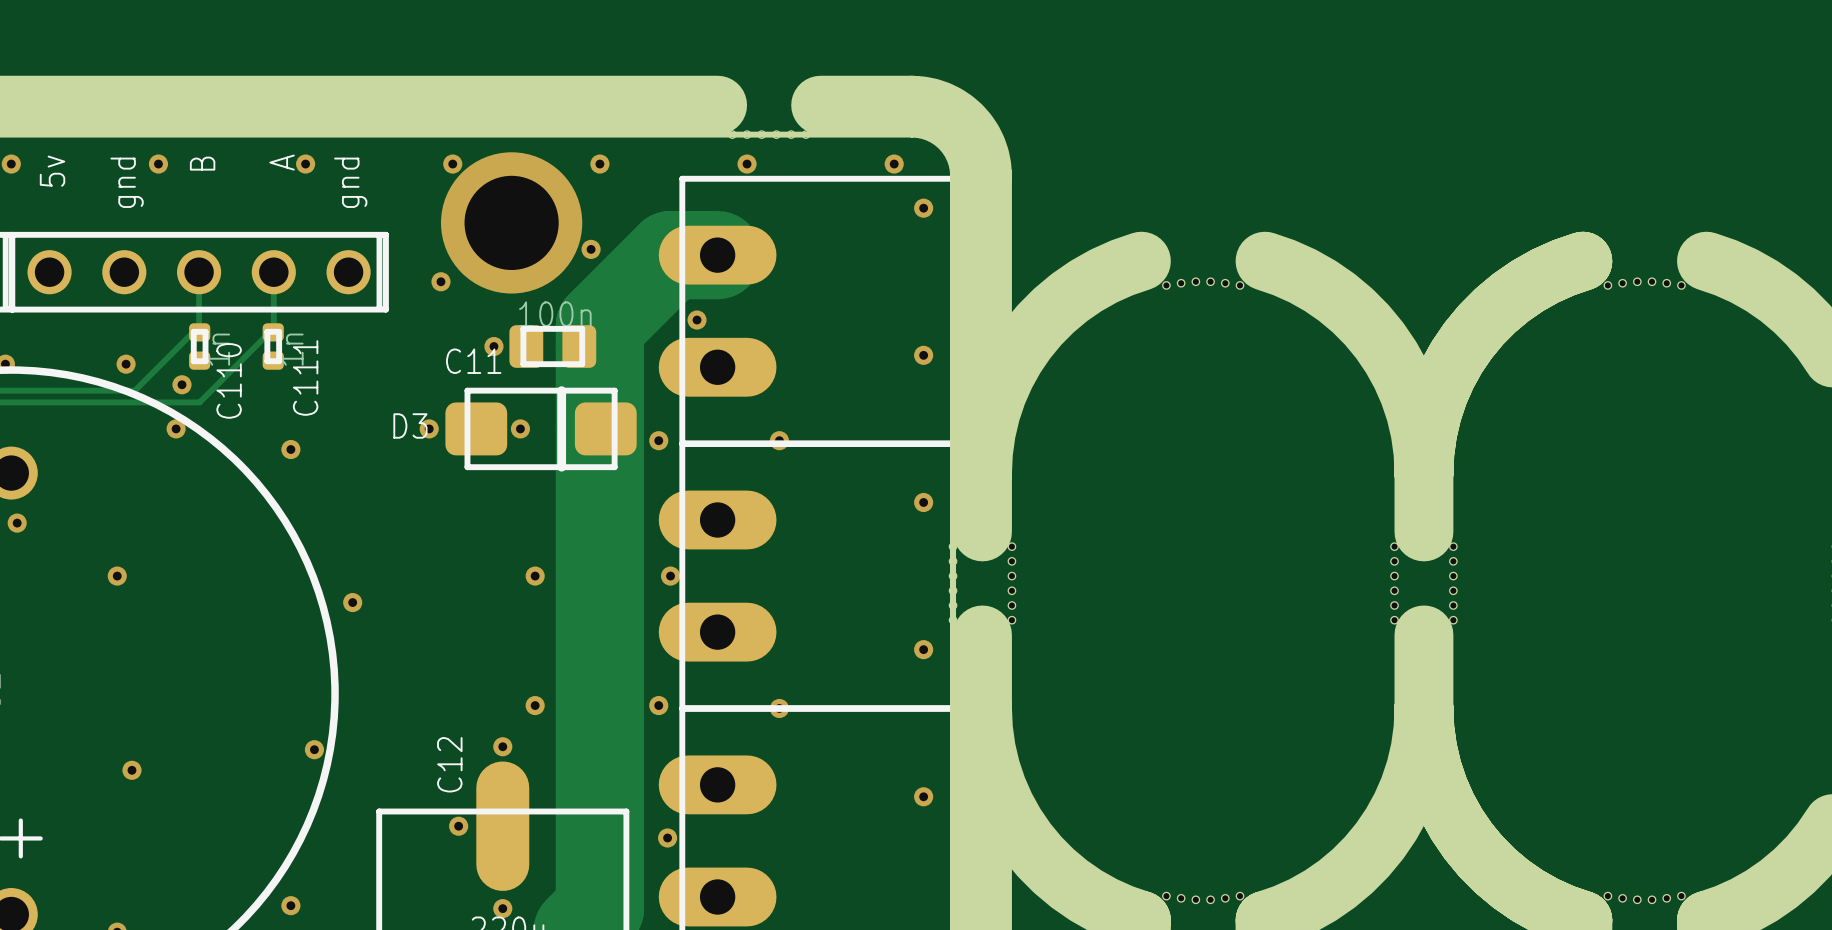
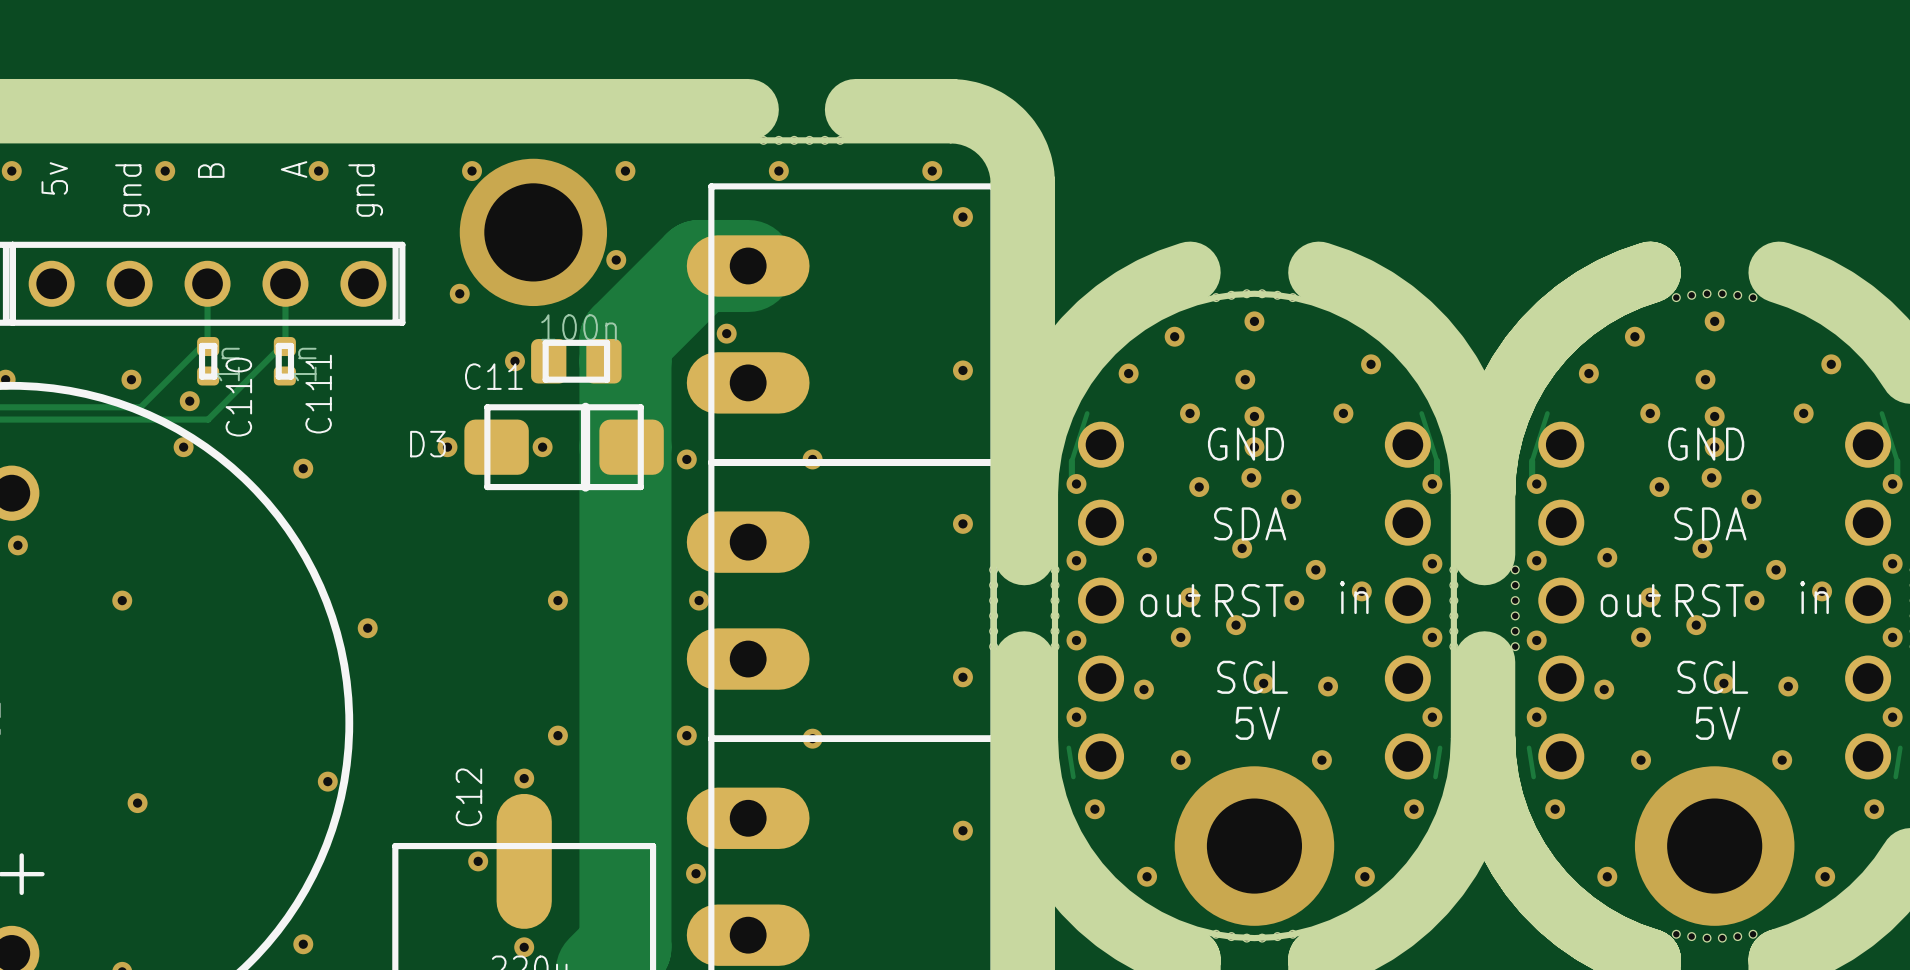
via: none -> (1254, 321)
via: none -> (1714, 321)
via: none -> (1174, 336)
via: none -> (1634, 336)
via: none -> (1371, 364)
via: none -> (1831, 364)
via: none -> (1128, 373)
via: none -> (1588, 373)
via: none -> (1245, 379)
via: none -> (1705, 379)
track: none -> (1087, 413) (1071, 460) (1071, 479) (1076, 483)
via: none -> (1190, 413)
via: none -> (1343, 413)
track: none -> (1421, 413) (1437, 460) (1437, 479) (1432, 483)
track: none -> (1547, 413) (1532, 460) (1532, 479) (1536, 483)
via: none -> (1650, 413)
via: none -> (1803, 413)
track: none -> (1881, 413) (1897, 460) (1897, 479) (1892, 483)
via: none -> (1254, 416)
via: none -> (1714, 416)
text: none -> GND (1245, 444)
text: none -> GND (1706, 444)
via: none -> (1254, 447)
via: none -> (1714, 447)
via: none -> (1251, 477)
via: none -> (1711, 477)
via: none -> (1076, 483)
via: none -> (1432, 483)
via: none -> (1536, 483)
via: none -> (1892, 483)
via: none -> (1199, 487)
via: none -> (1659, 487)
board edge: none -> (1453, 493) (1452, 758) (1445, 796) (1438, 814) (1430, 832) (1408, 865) (1380, 892) (1348, 914) (1312, 929) (1273, 937) (1234, 937) (1196, 929) (1160, 914) (1127, 892) (1100, 865) (1078, 832) (1063, 796) (1055, 758) (1055, 473) (1063, 435) (1070, 416) (1078, 399) (1100, 366) (1127, 339) (1143, 327) (1160, 317) (1196, 302) (1215, 297) (1254, 293) (1293, 297) (1312, 302) (1348, 317) (1365, 327) (1380, 339) (1408, 366) (1430, 399) (1445, 435) (1450, 454) (1453, 493)
via: none -> (1291, 499)
via: none -> (1751, 499)
text: none -> SDA (1250, 523)
text: none -> SDA (1710, 523)
via: none -> (1242, 548)
via: none -> (1702, 548)
via: none -> (1147, 557)
via: none -> (1607, 557)
via: none -> (1076, 560)
via: none -> (1536, 560)
via: none -> (1432, 563)
via: none -> (1892, 563)
via: none -> (1315, 569)
via: none -> (1776, 569)
via: none -> (1361, 591)
via: none -> (1822, 591)
via: none -> (1190, 597)
text: none -> in (1354, 597)
via: none -> (1650, 597)
text: none -> in (1814, 597)
part: none -> (1101, 600)
text: none -> out (1170, 600)
text: none -> RST (1249, 600)
via: none -> (1294, 600)
part: none -> (1407, 600)
part: none -> (1561, 600)
text: none -> out (1630, 600)
text: none -> RST (1709, 600)
via: none -> (1754, 600)
part: none -> (1868, 600)
via: none -> (1236, 625)
via: none -> (1696, 625)
via: none -> (1180, 637)
via: none -> (1432, 637)
via: none -> (1641, 637)
via: none -> (1892, 637)
via: none -> (1076, 640)
via: none -> (1536, 640)
text: none -> SCL (1252, 677)
text: none -> SCL (1712, 677)
via: none -> (1263, 683)
via: none -> (1723, 683)
via: none -> (1328, 686)
via: none -> (1788, 686)
via: none -> (1143, 689)
via: none -> (1604, 689)
via: none -> (1076, 717)
via: none -> (1432, 717)
via: none -> (1536, 717)
via: none -> (1892, 717)
text: none -> 5V (1257, 723)
text: none -> 5V (1718, 723)
track: none -> (1068, 747) (1073, 777)
track: none -> (1440, 747) (1435, 777)
track: none -> (1529, 747) (1533, 777)
track: none -> (1900, 747) (1895, 777)
via: none -> (1180, 760)
via: none -> (1321, 760)
via: none -> (1641, 760)
via: none -> (1782, 760)
via: none -> (1094, 809)
via: none -> (1413, 809)
via: none -> (1555, 809)
via: none -> (1874, 809)
via: none -> (1254, 846)
via: none -> (1714, 846)
via: none -> (1147, 876)
via: none -> (1364, 876)
via: none -> (1607, 876)
via: none -> (1825, 876)

